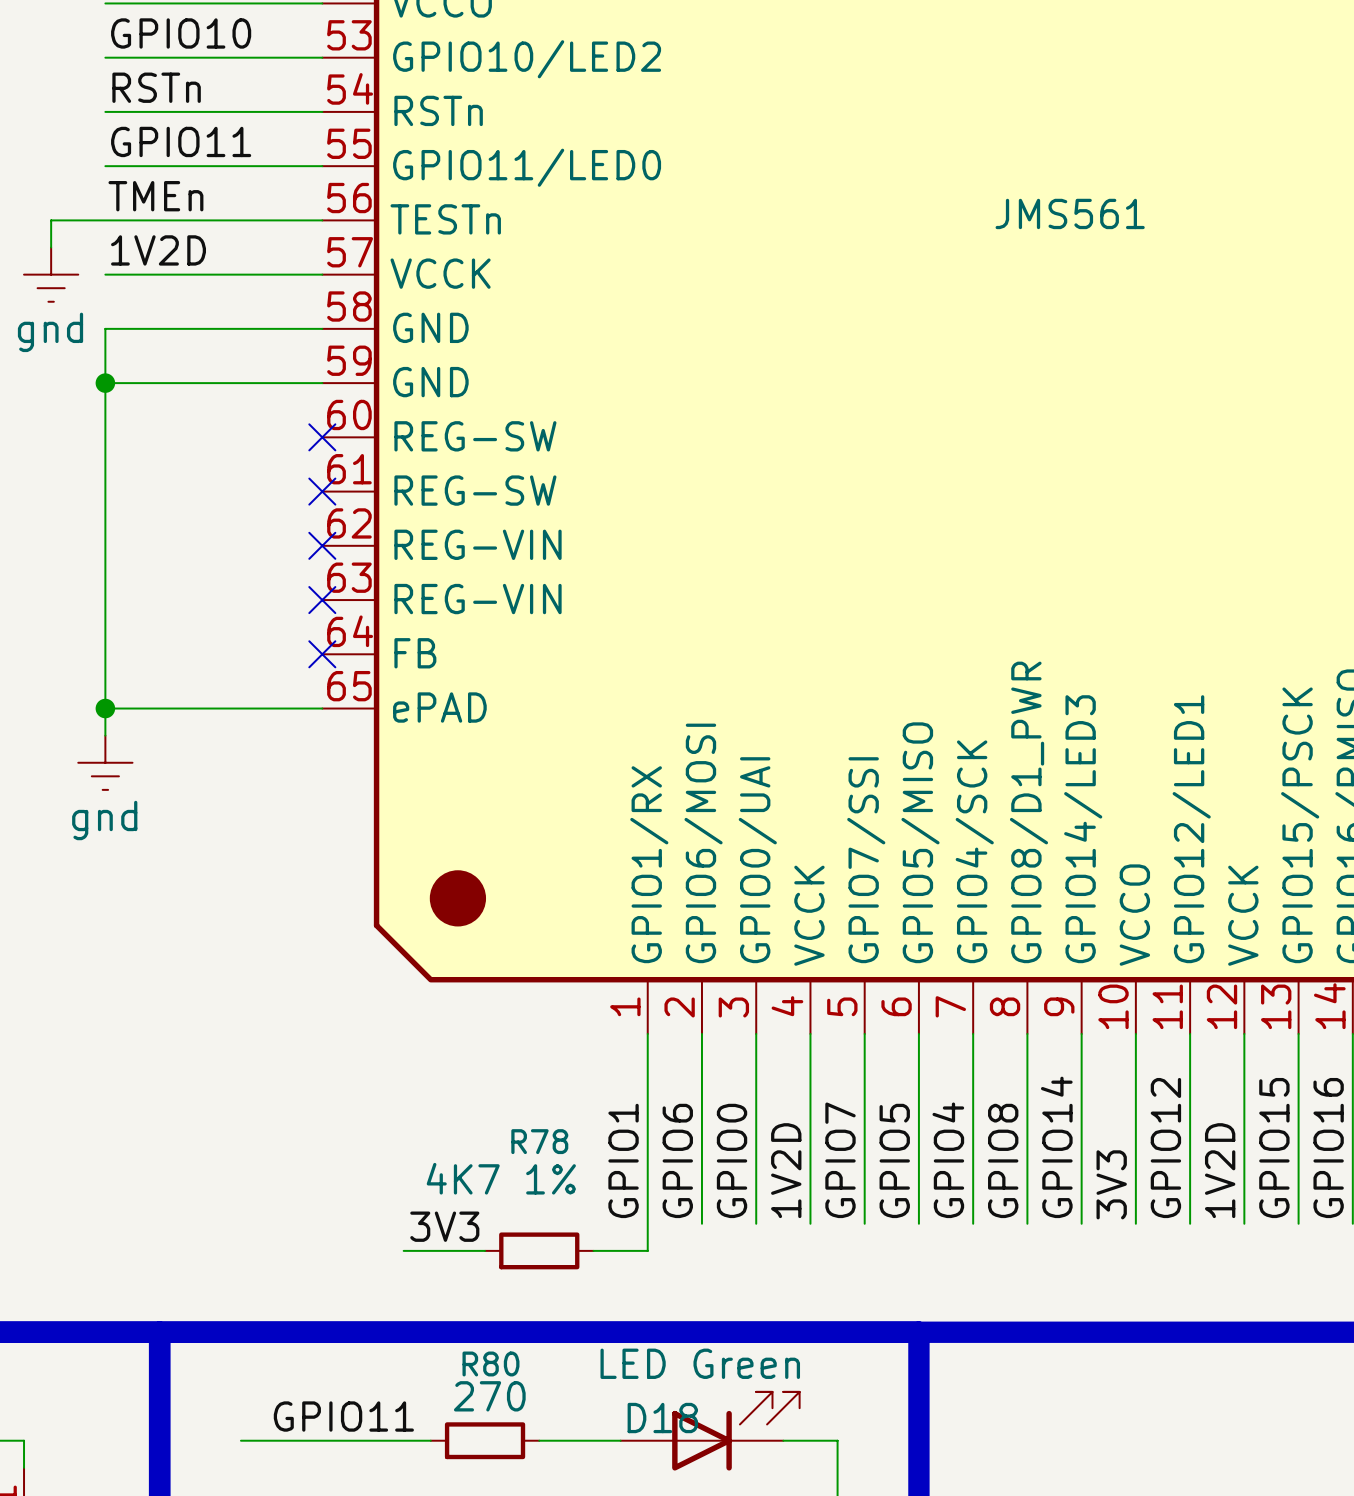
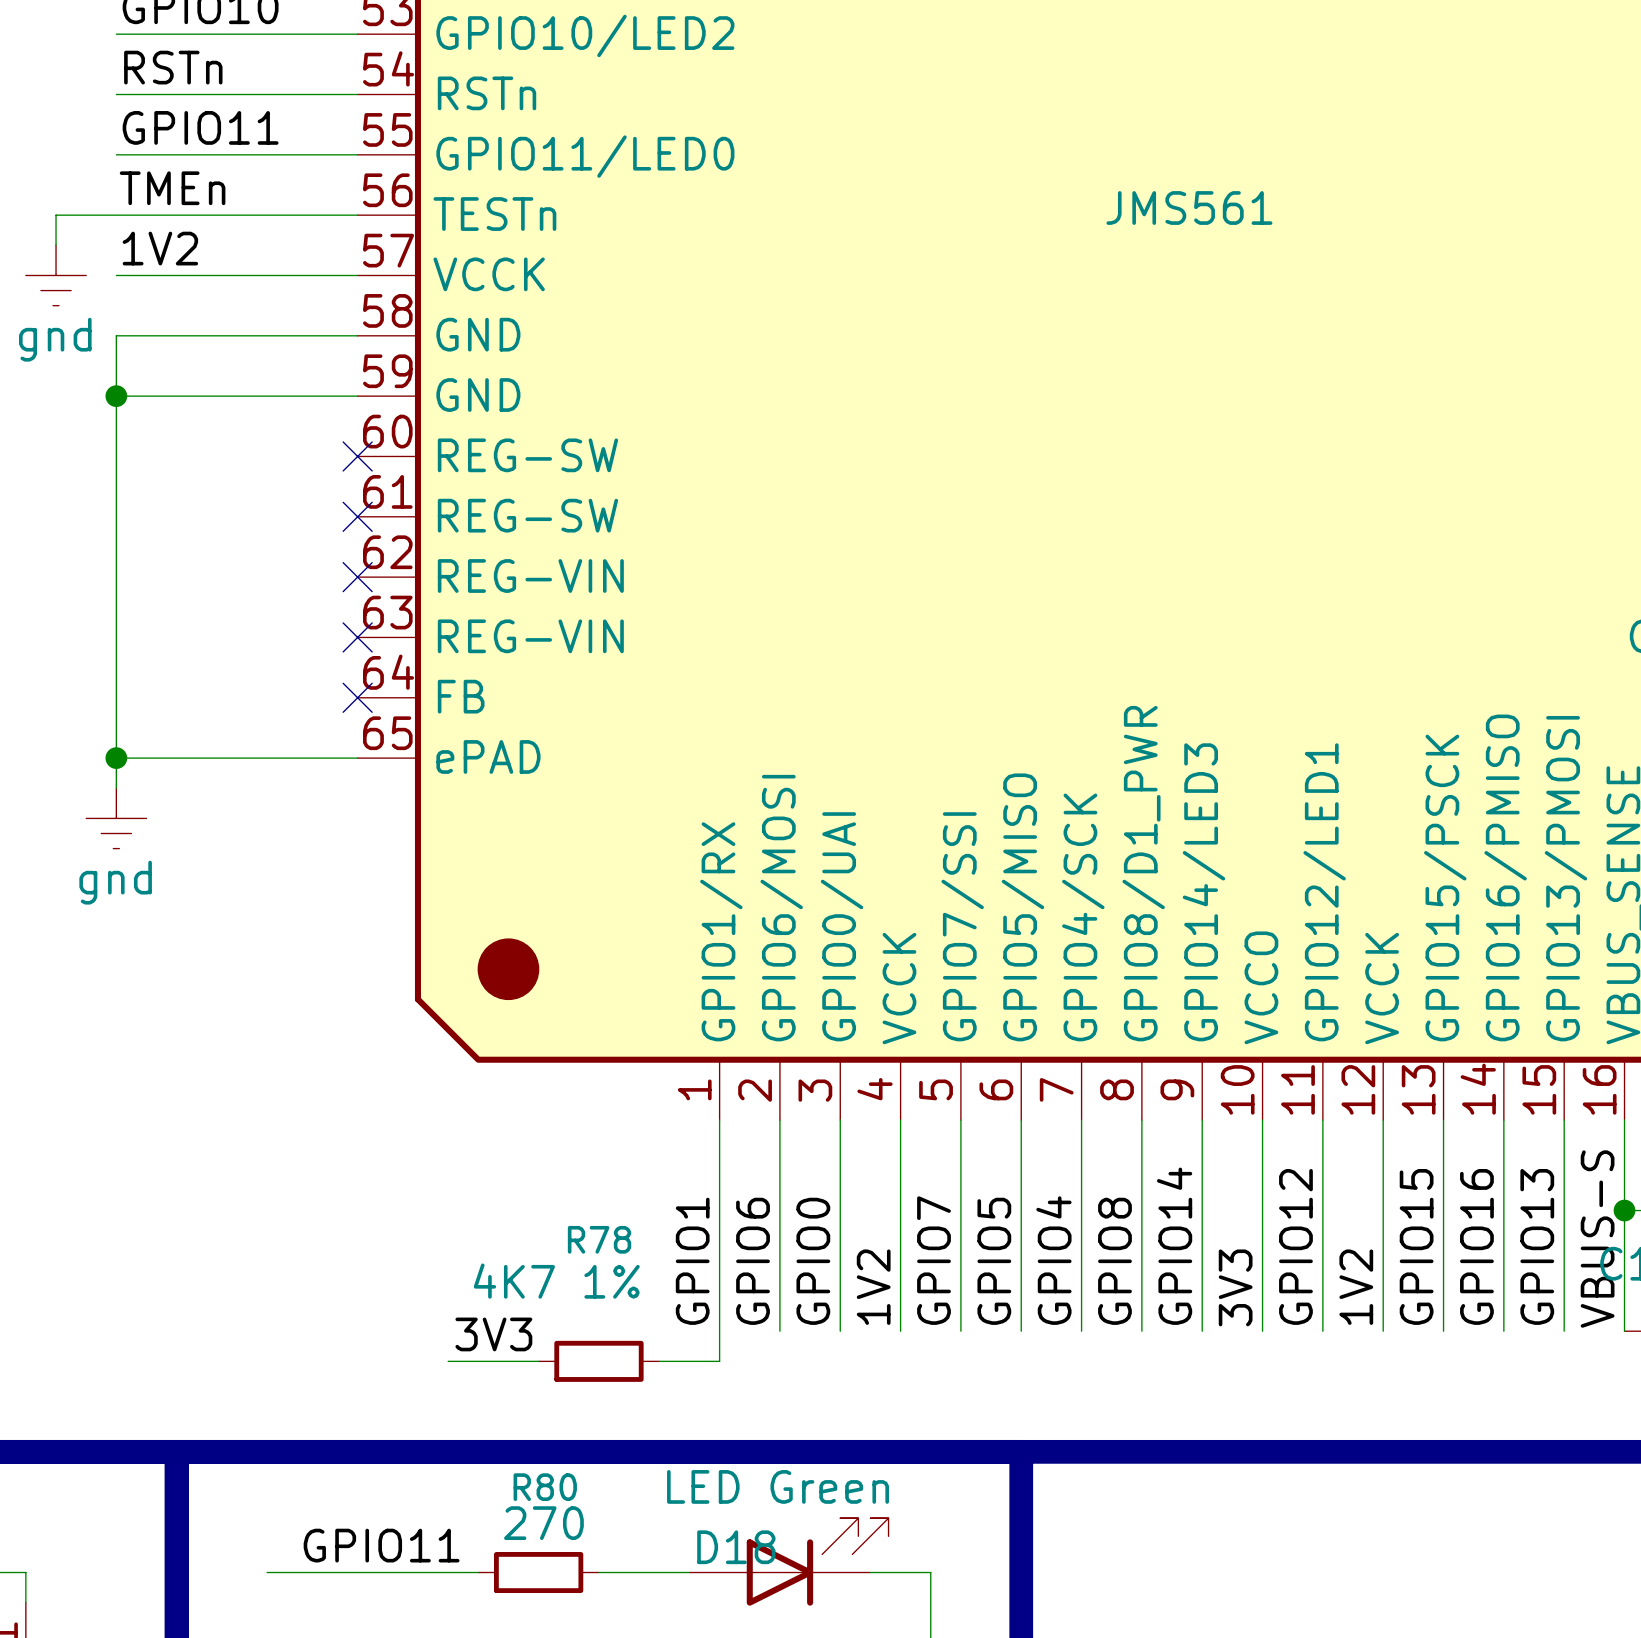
label: 1V2D (158, 250) -> 1V2 (160, 248)
label: 1V2D (786, 1170) -> 1V2 (873, 1287)
label: 1V2D (1220, 1170) -> 1V2 (1356, 1287)

